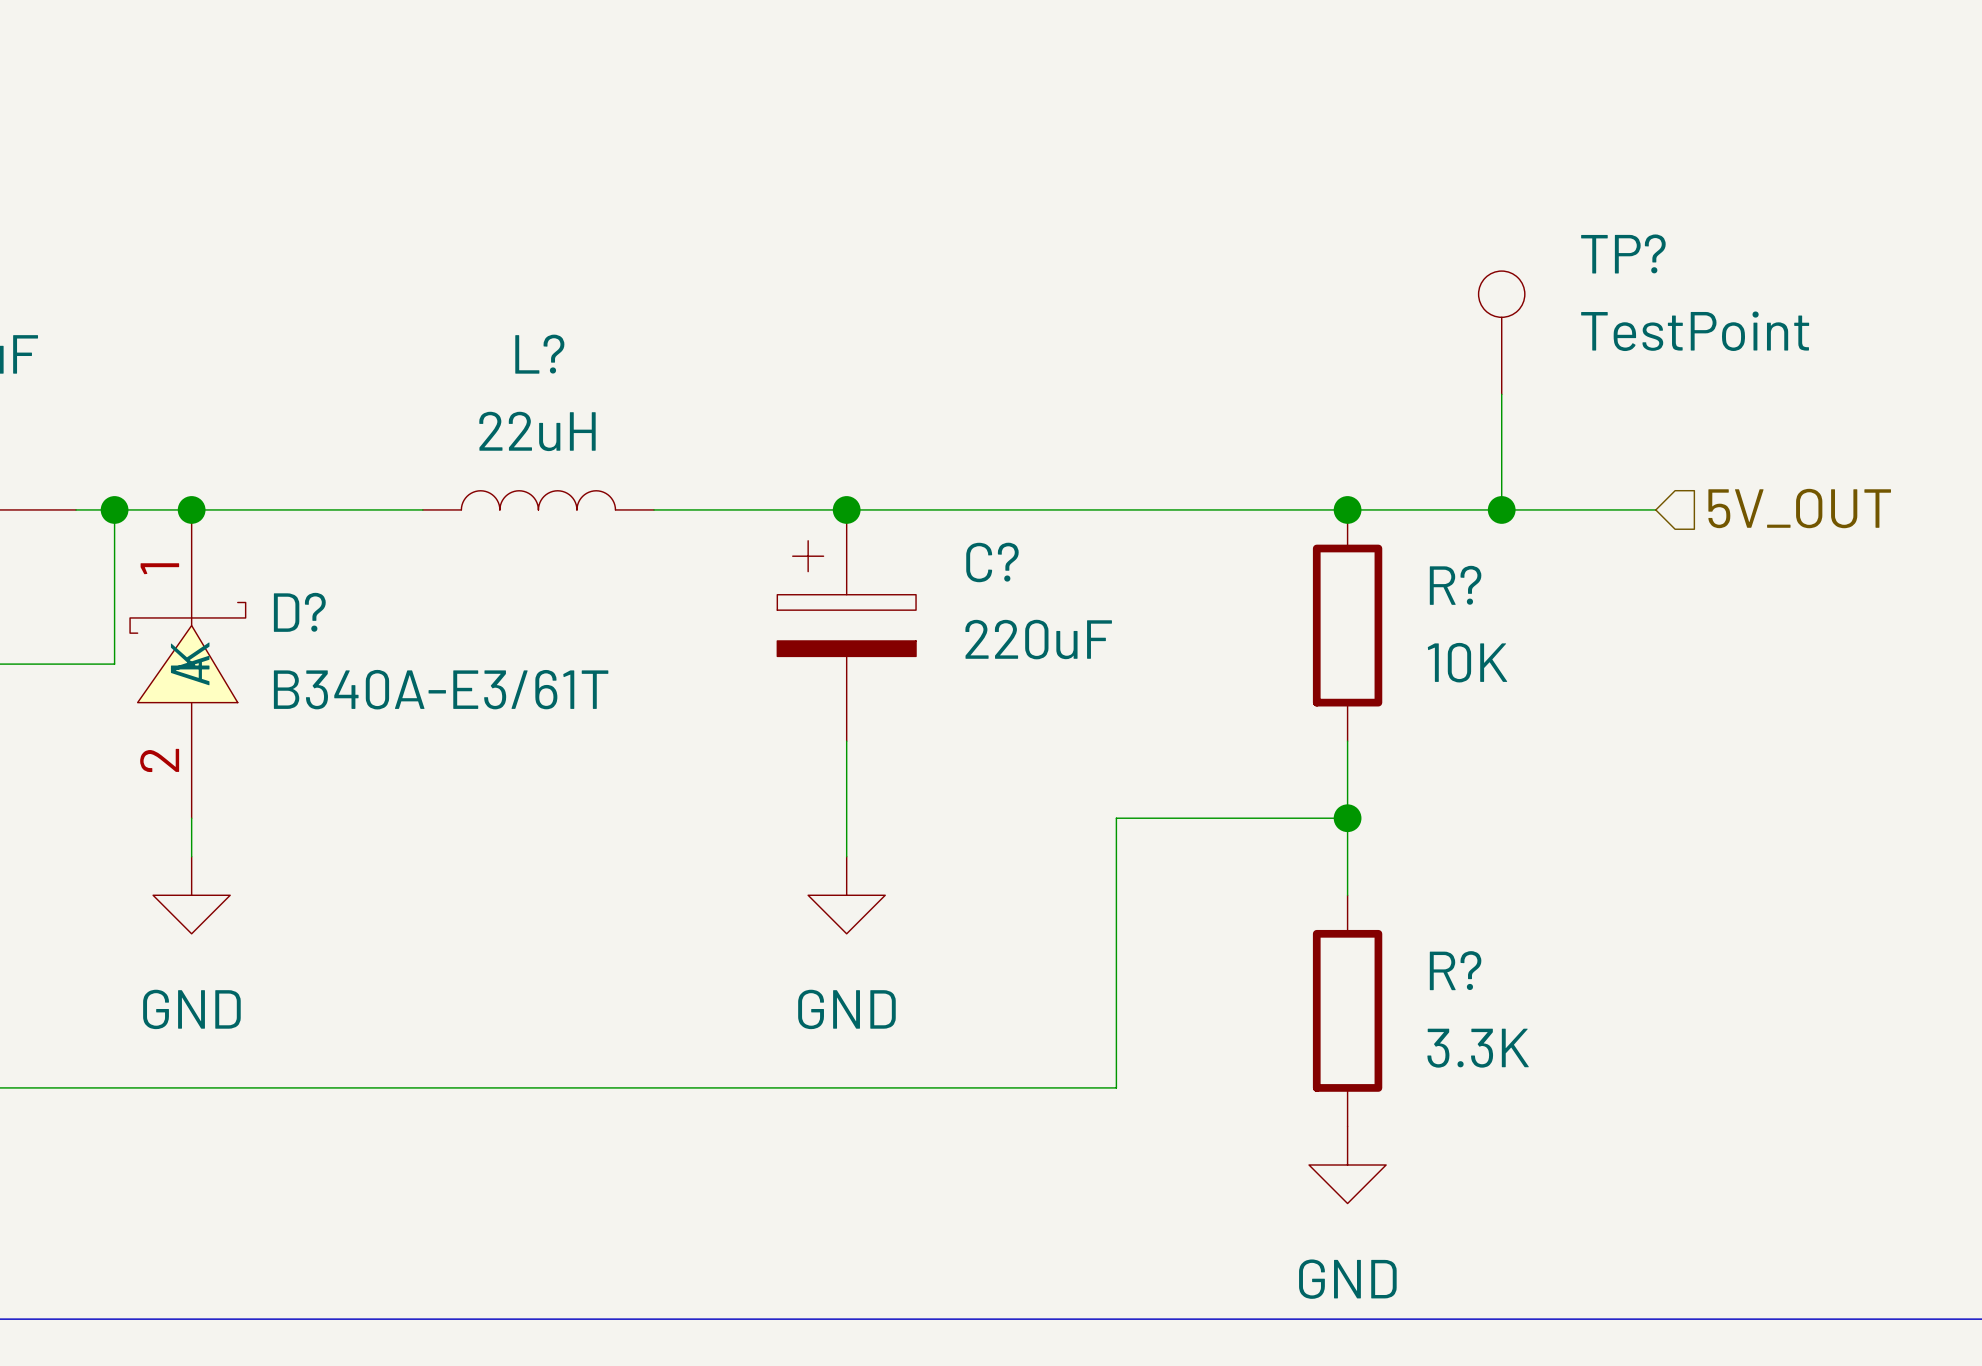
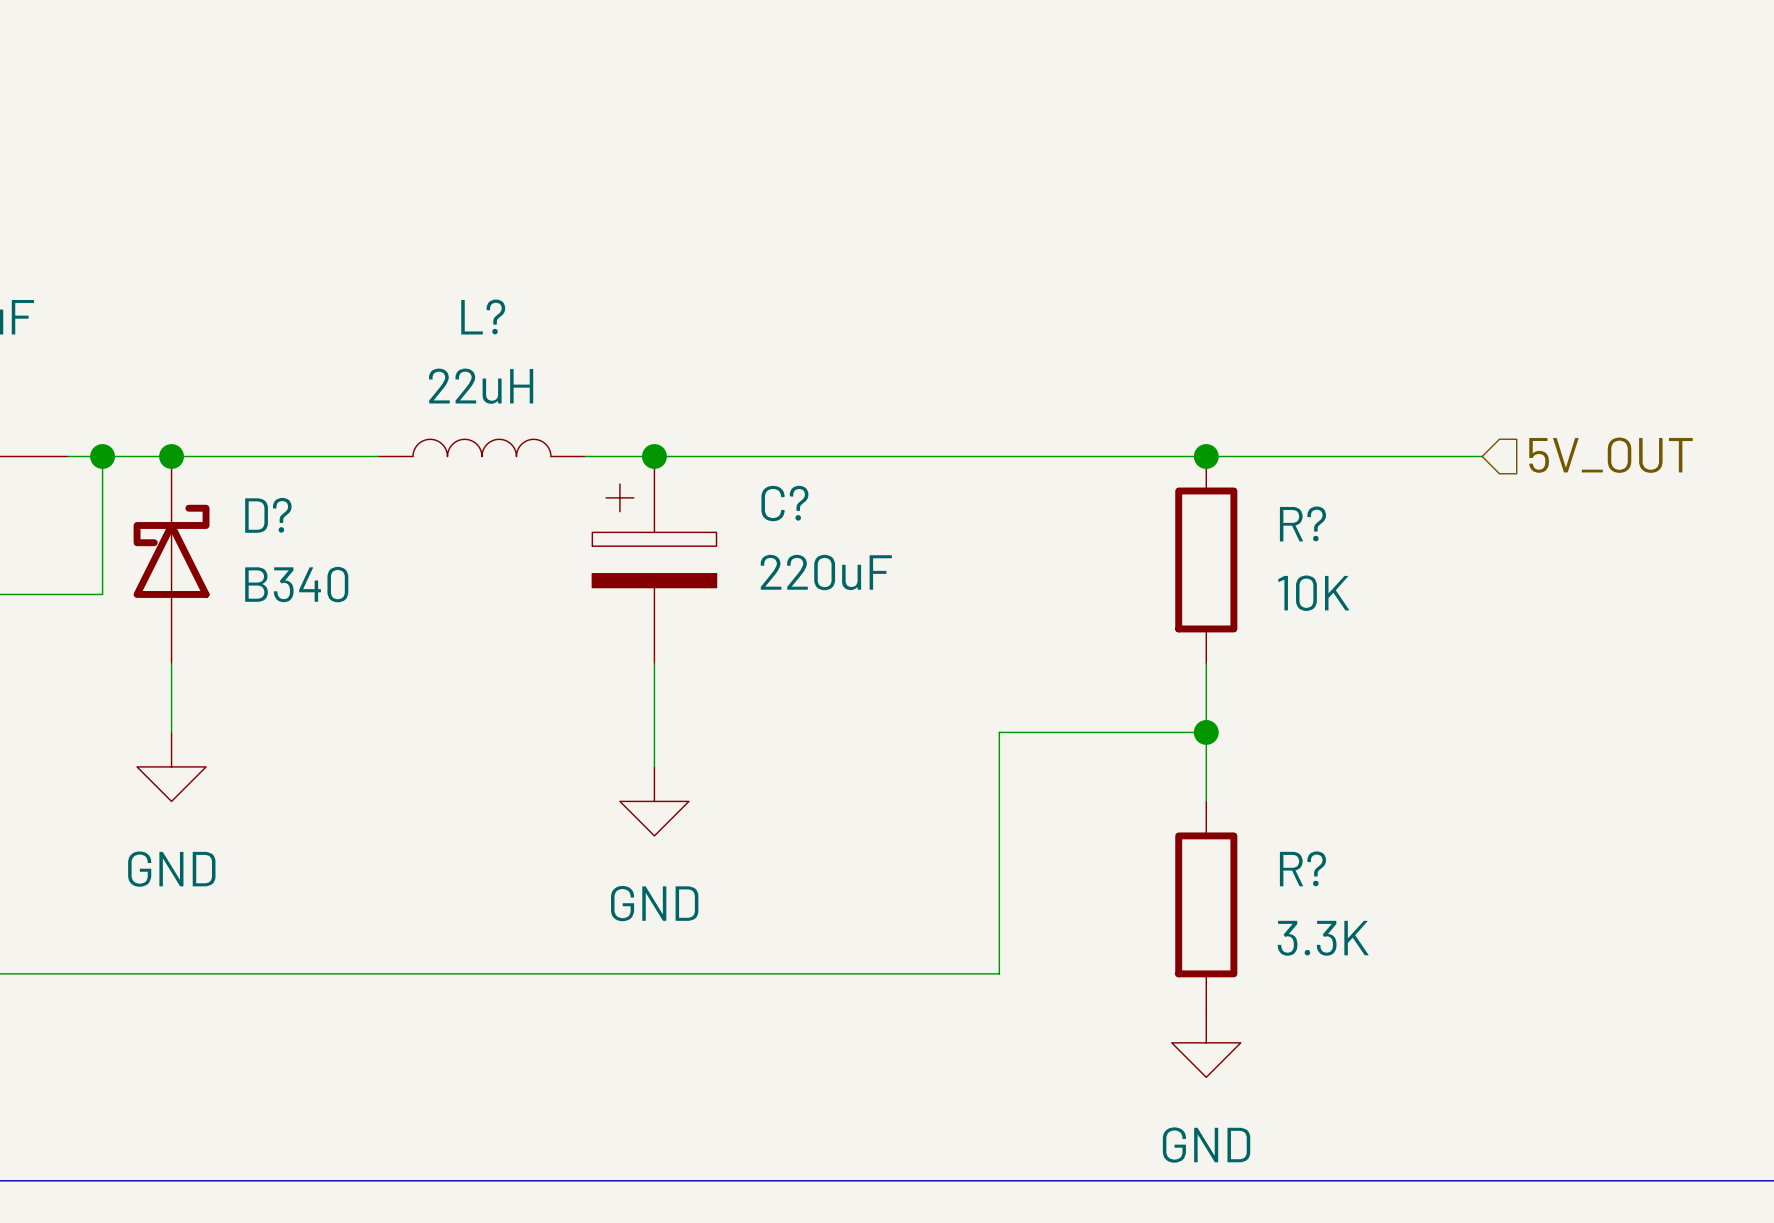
TP?: TestPoint (1501, 332) -> none
wire: (1501, 394) (1501, 509) -> none
junction position: (846, 509) -> (654, 456)
junction: (1501, 509) -> none
D?: none -> B340 (171, 559)
C? position: (846, 625) -> (654, 559)
D?: B340A-E3/61T (187, 664) -> none
wire: (846, 741) (846, 856) -> (654, 663) (654, 766)
power symbol position: GND (191, 895) -> GND (171, 766)
power symbol position: GND (846, 895) -> GND (654, 801)

